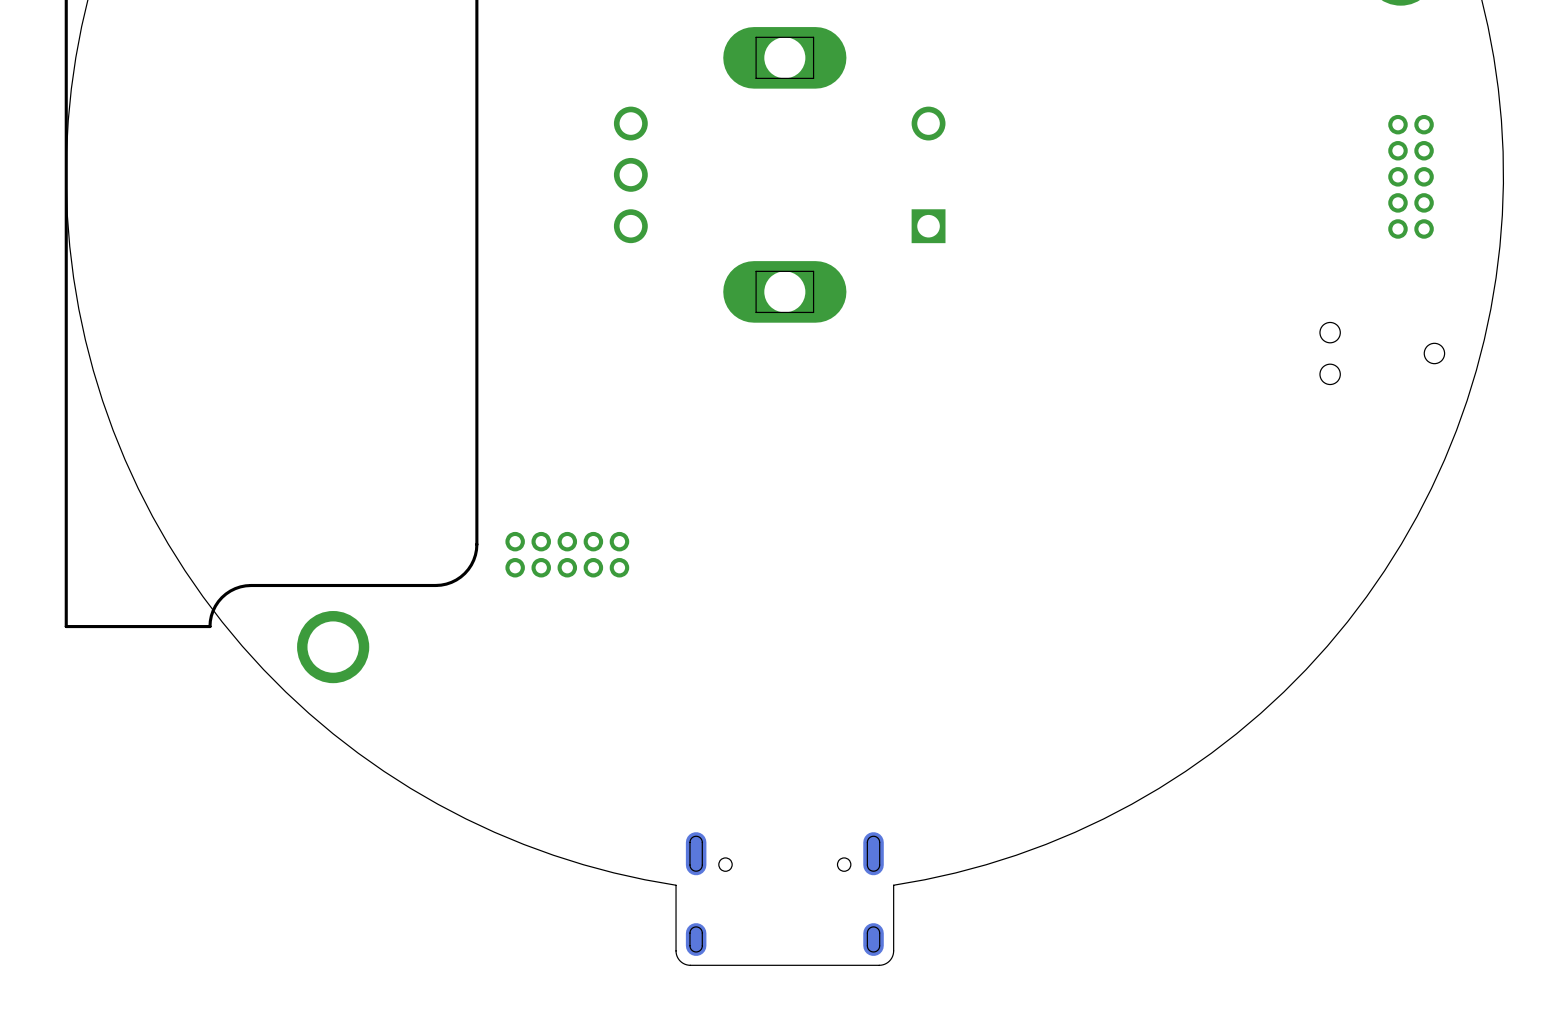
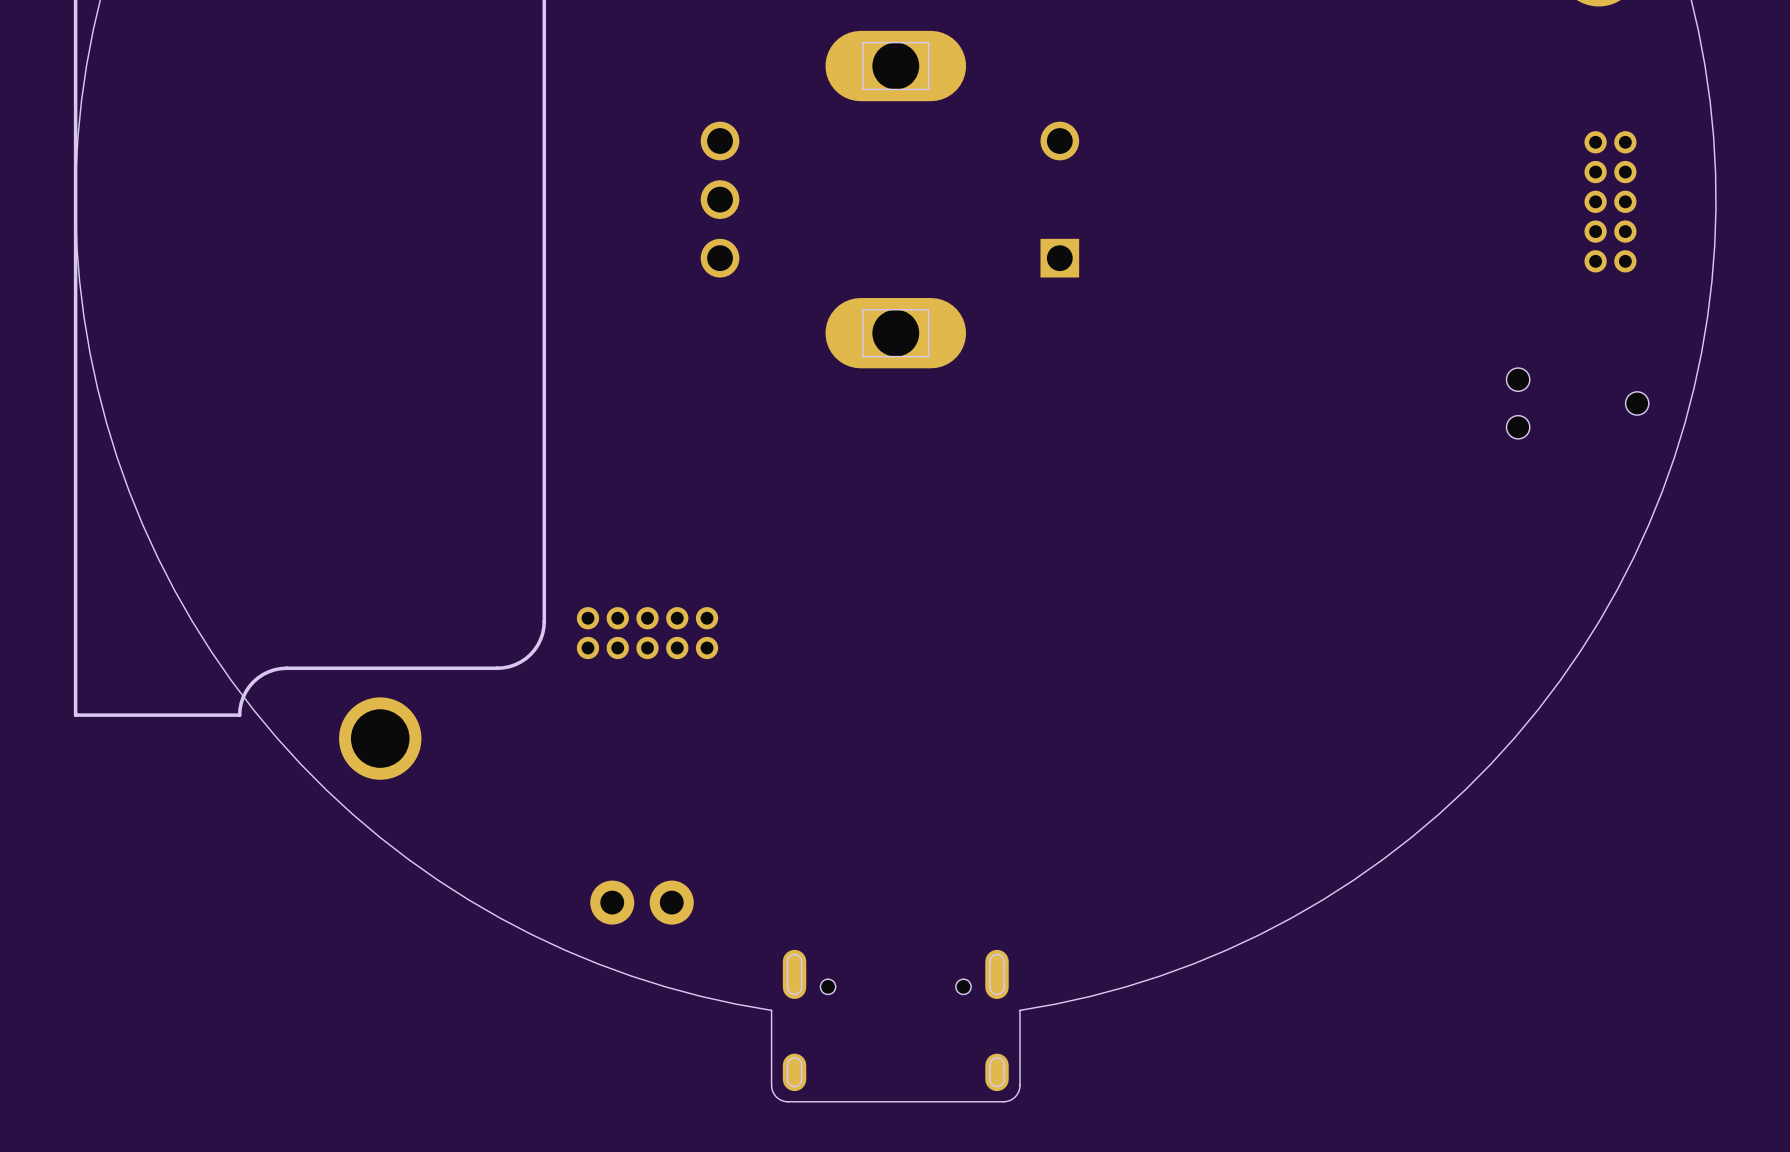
part: none -> (642, 902)

